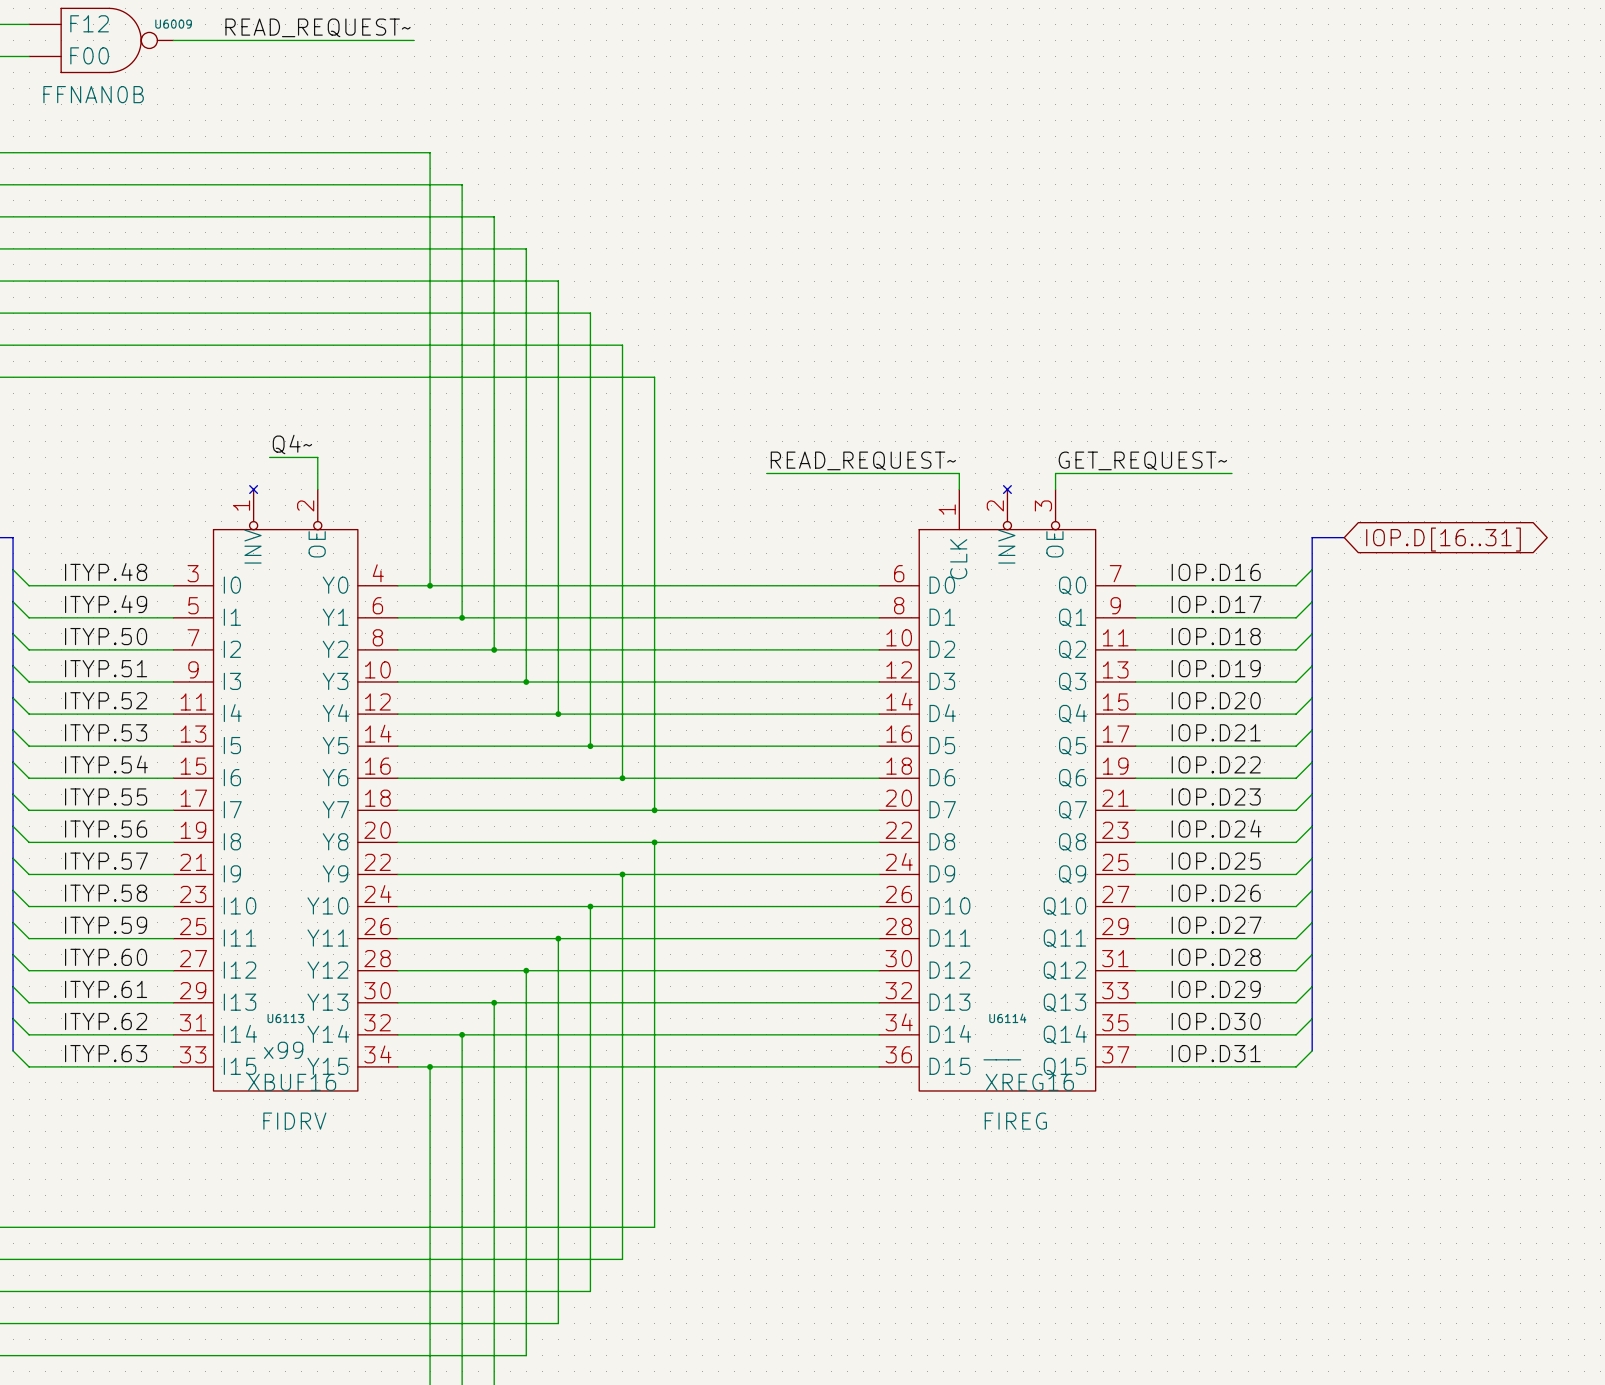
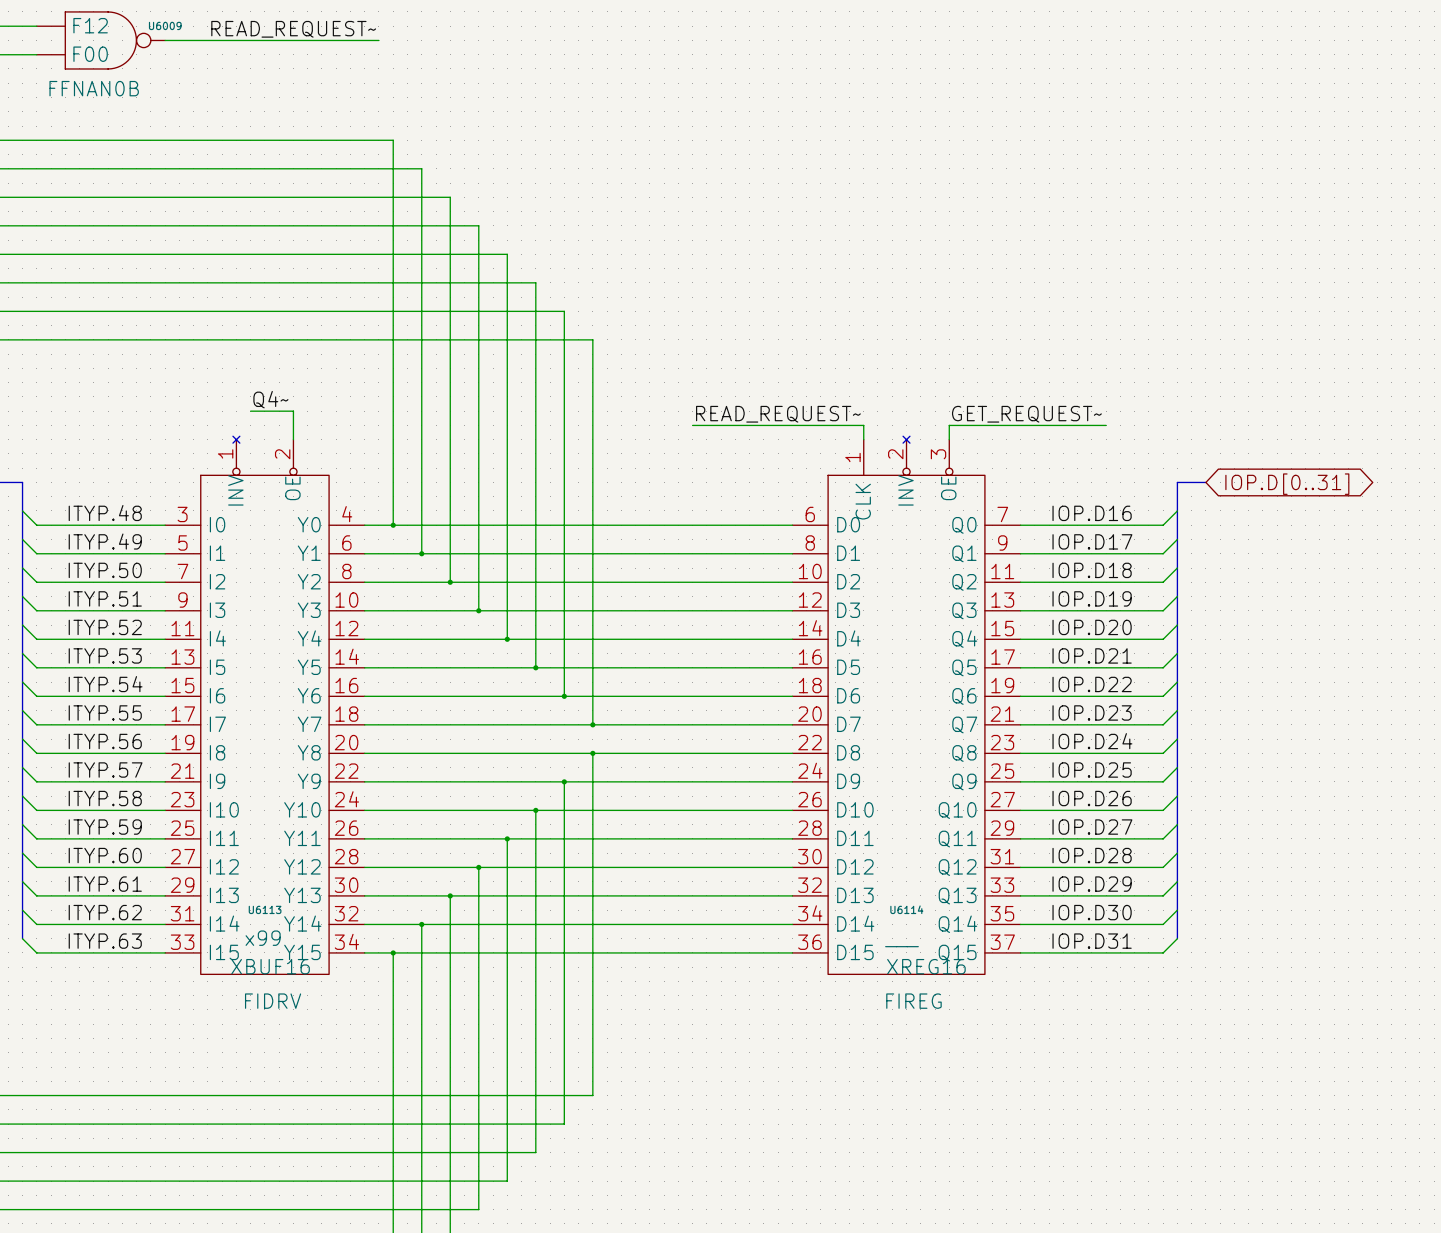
global label: IOP.D[16..31] (1443, 539) -> IOP.D[0..31] (1287, 484)

